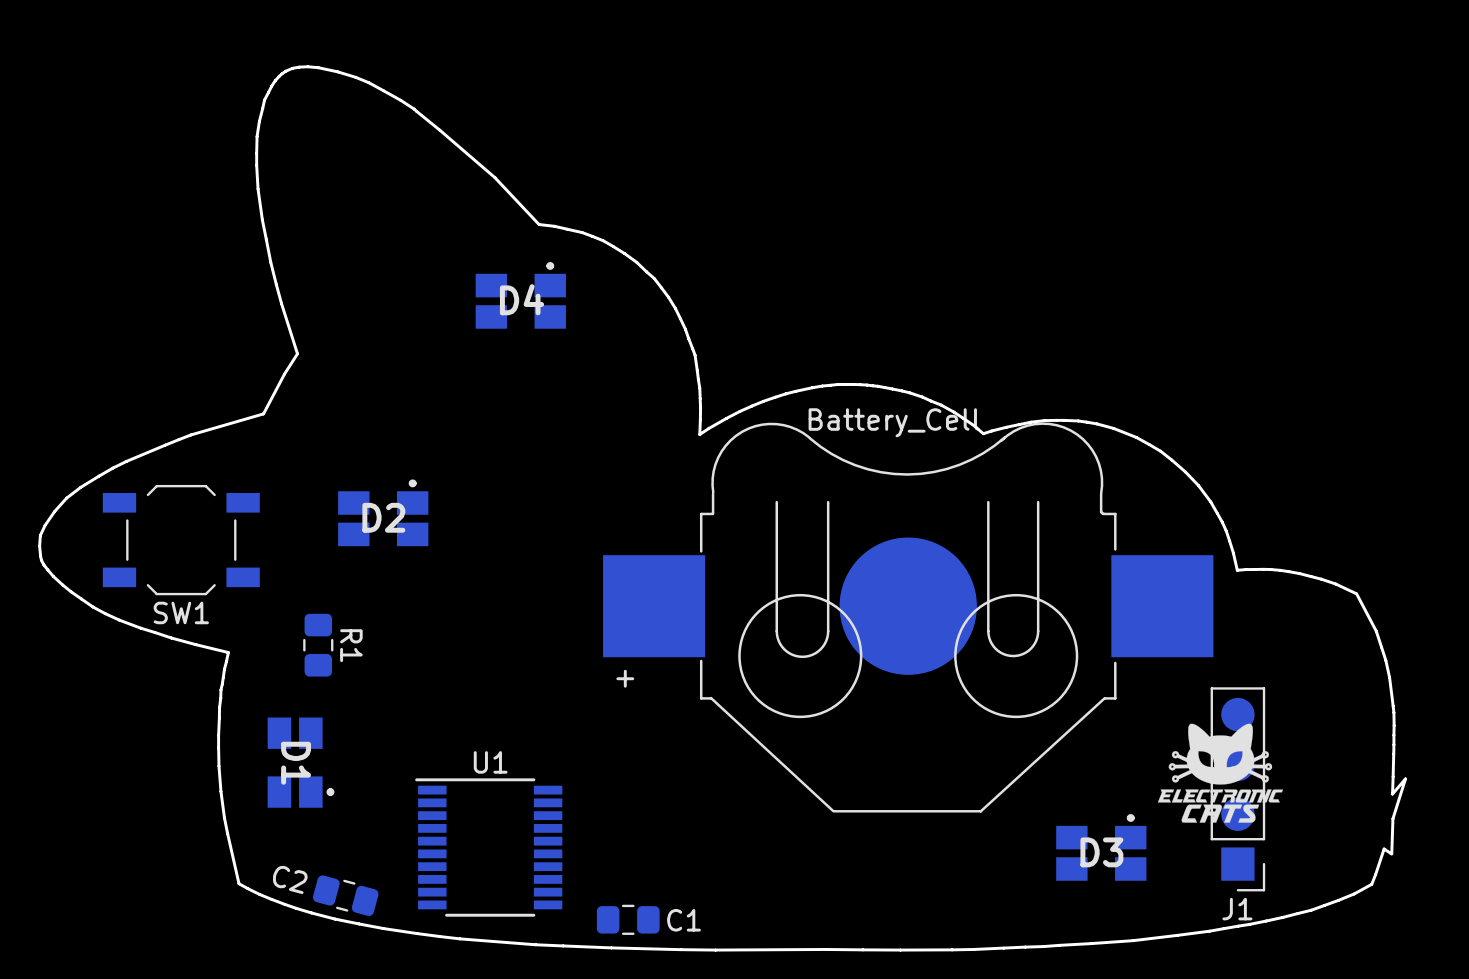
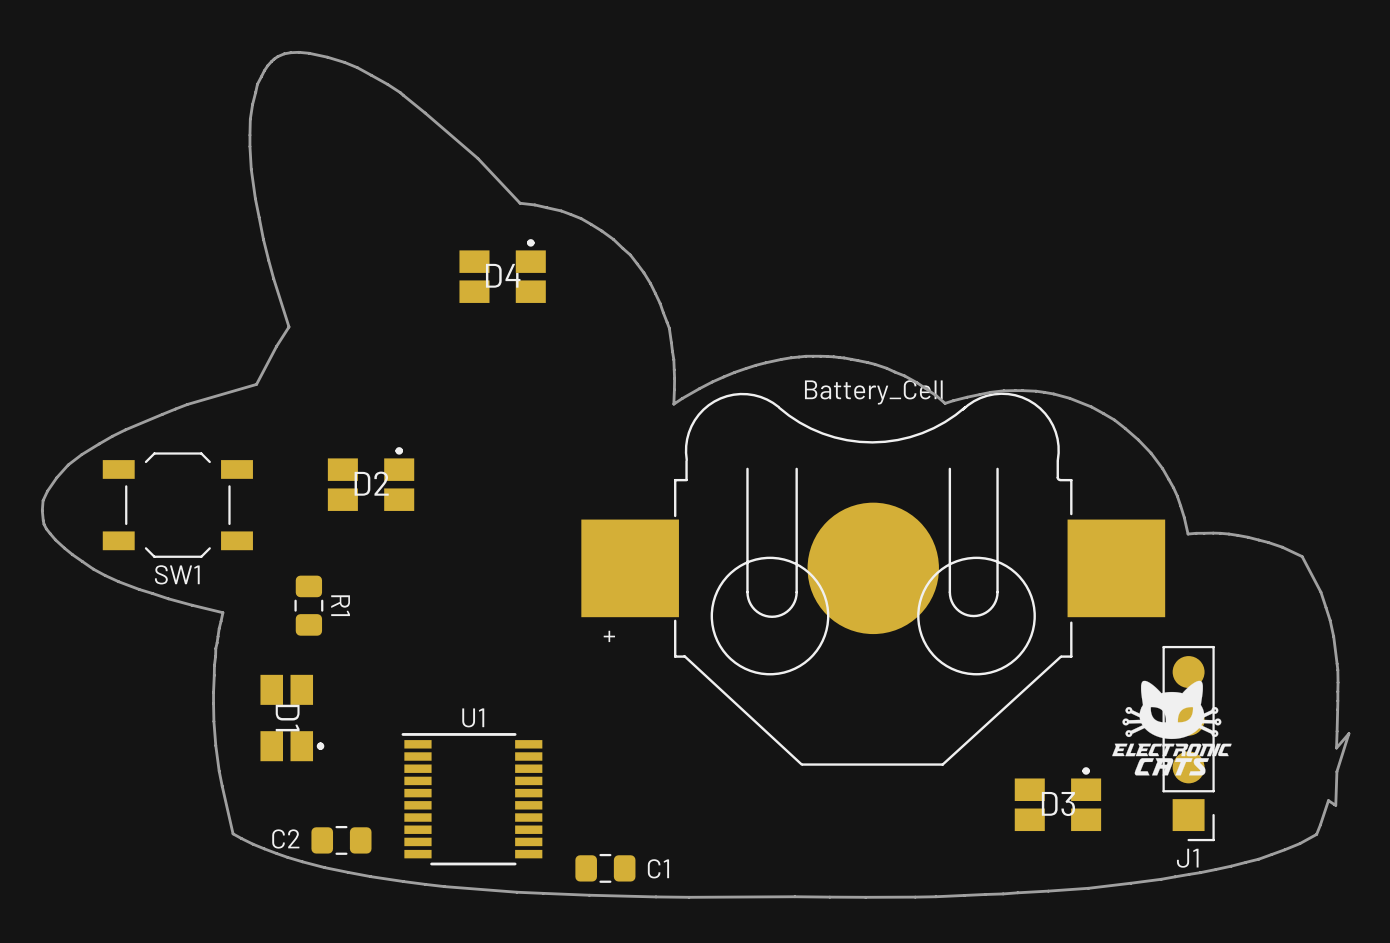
C2 rotation: 0° (345, 895) -> 15° counterclockwise (341, 840)

